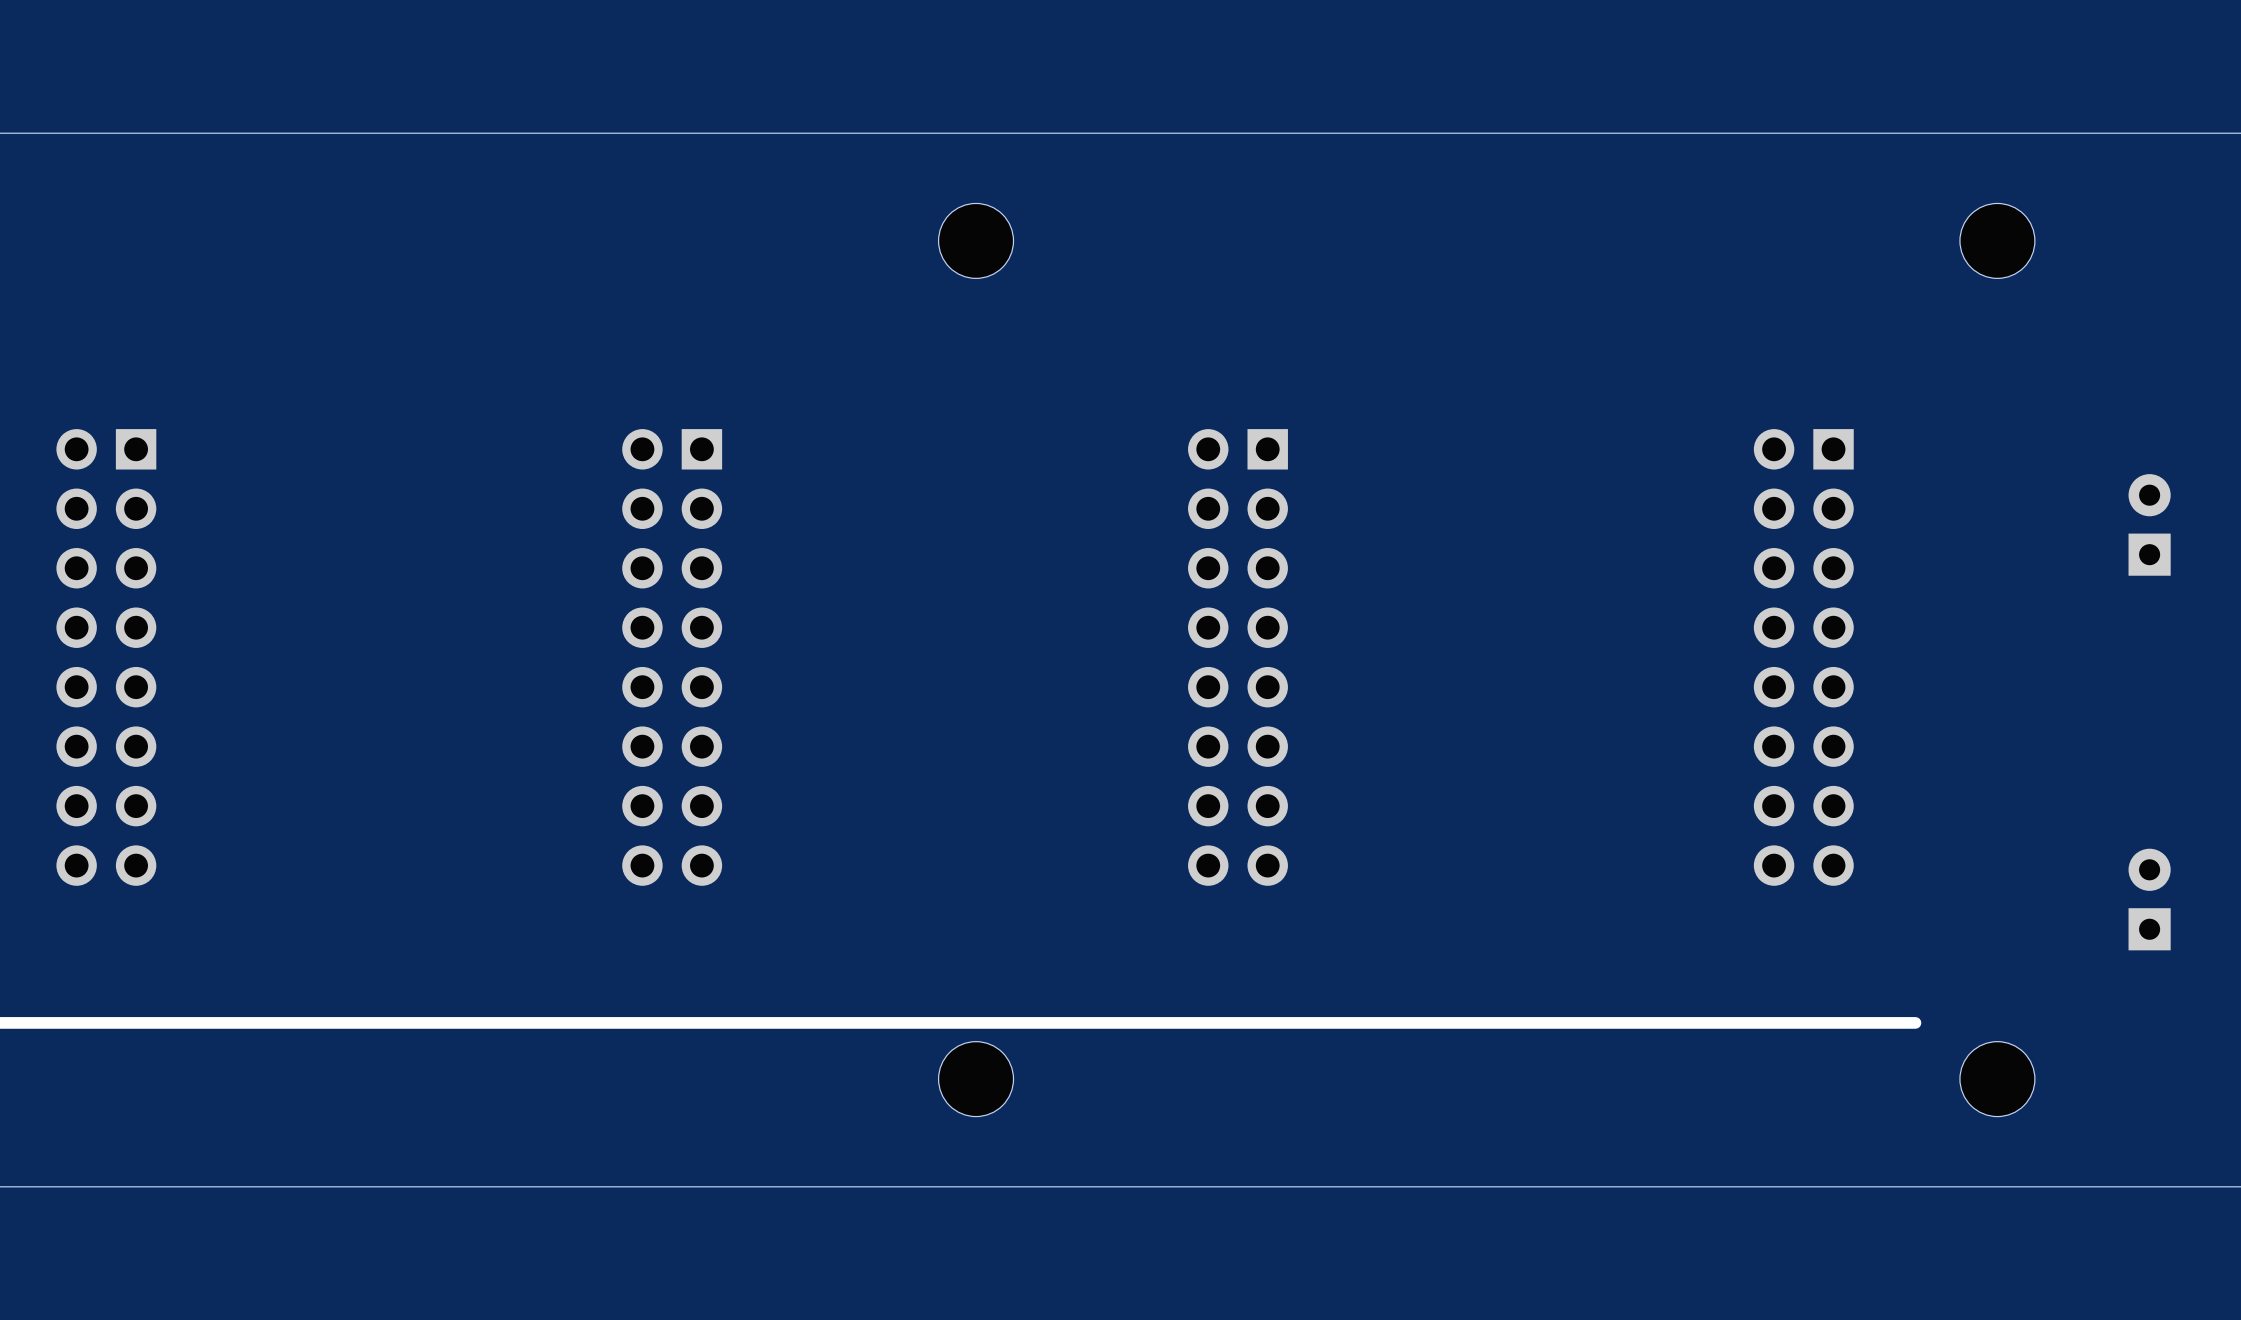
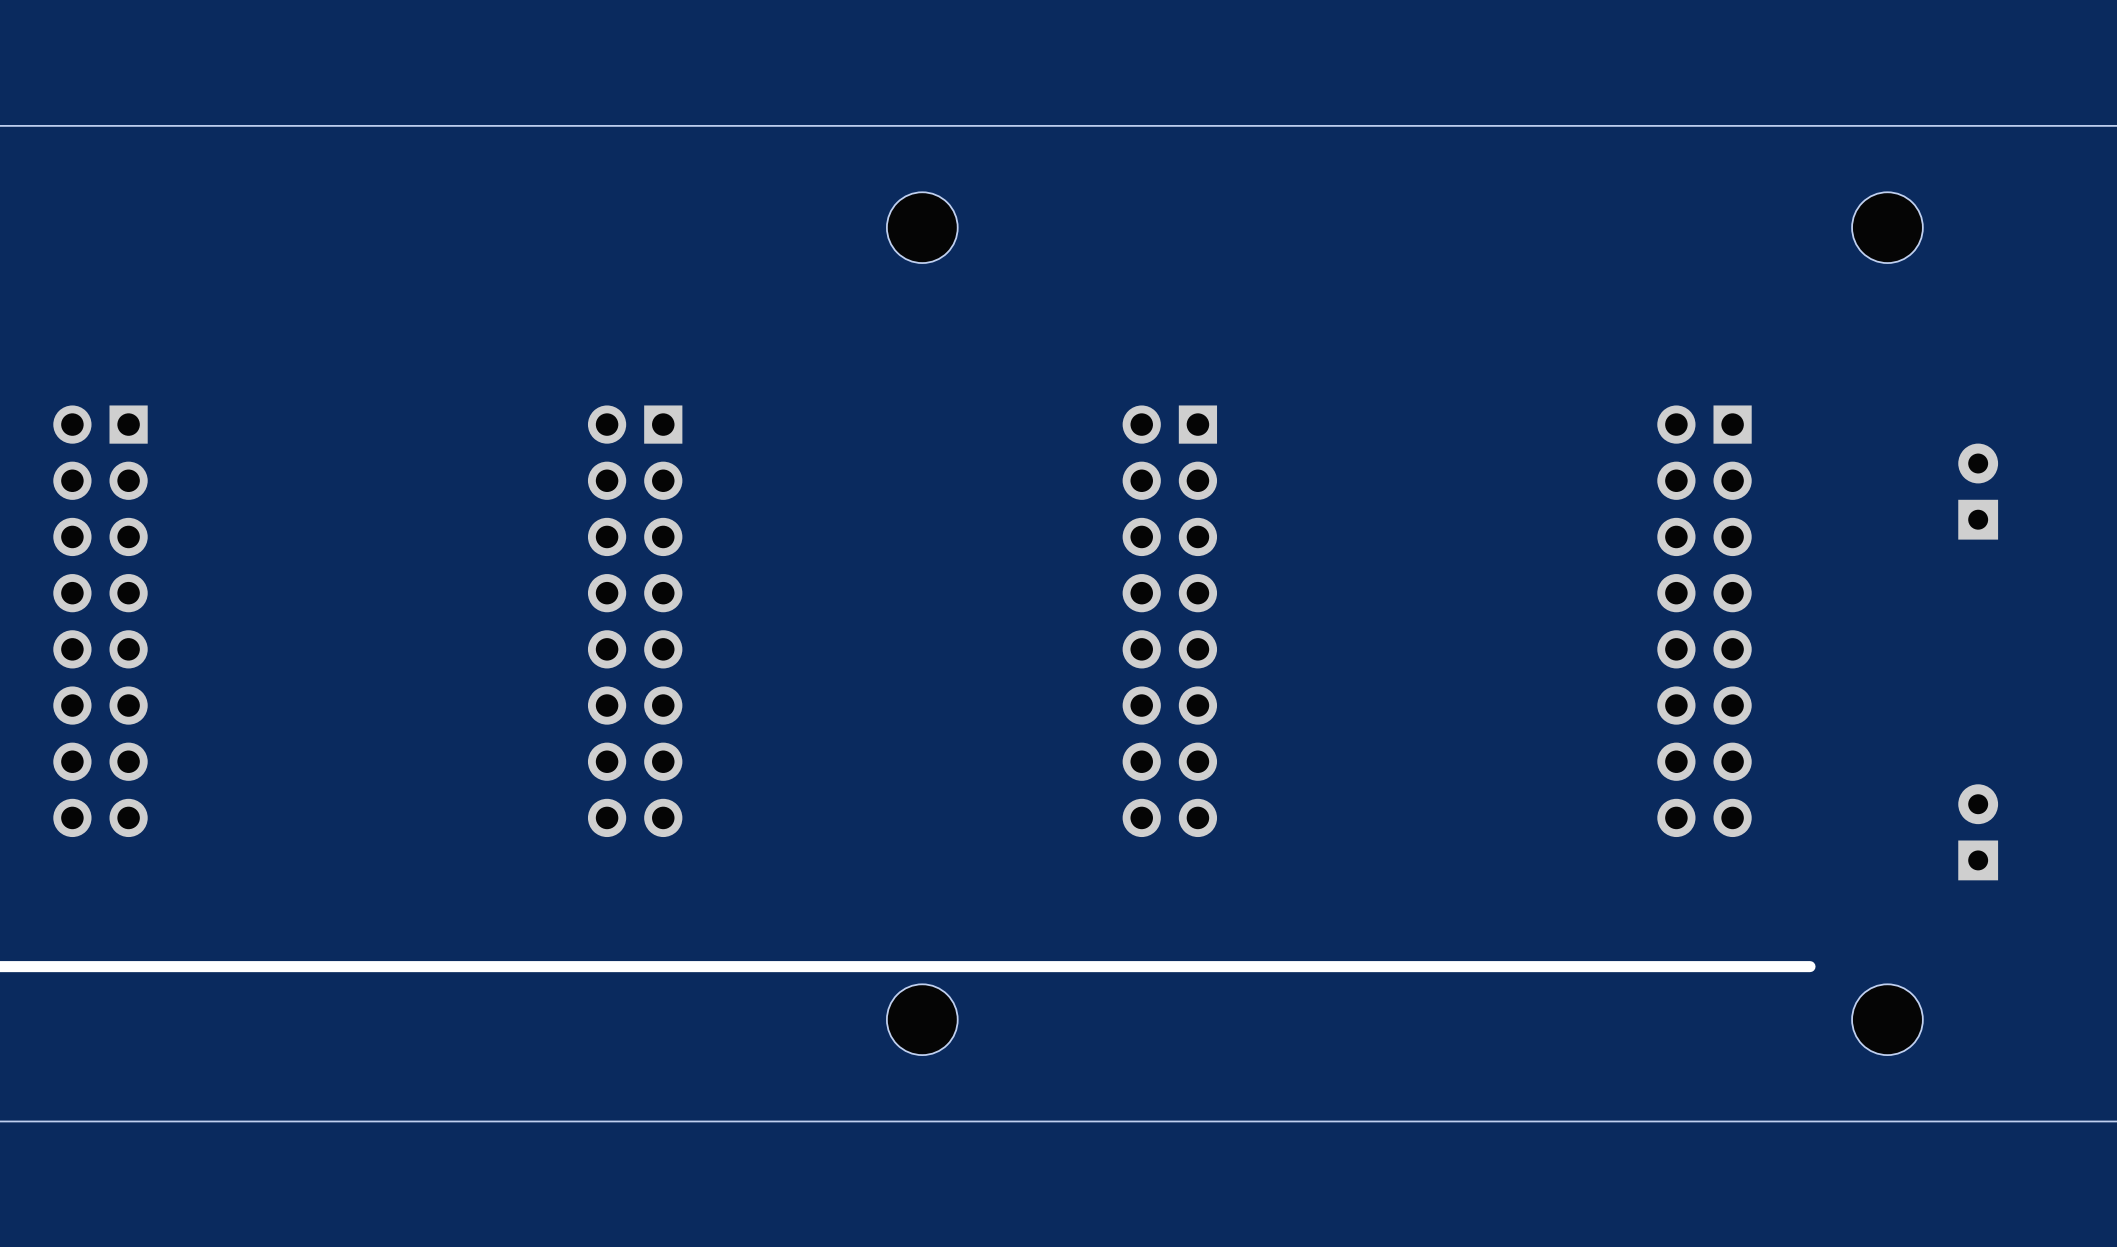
part position: (2149, 524) -> (1978, 491)
part position: (2149, 899) -> (1978, 832)

